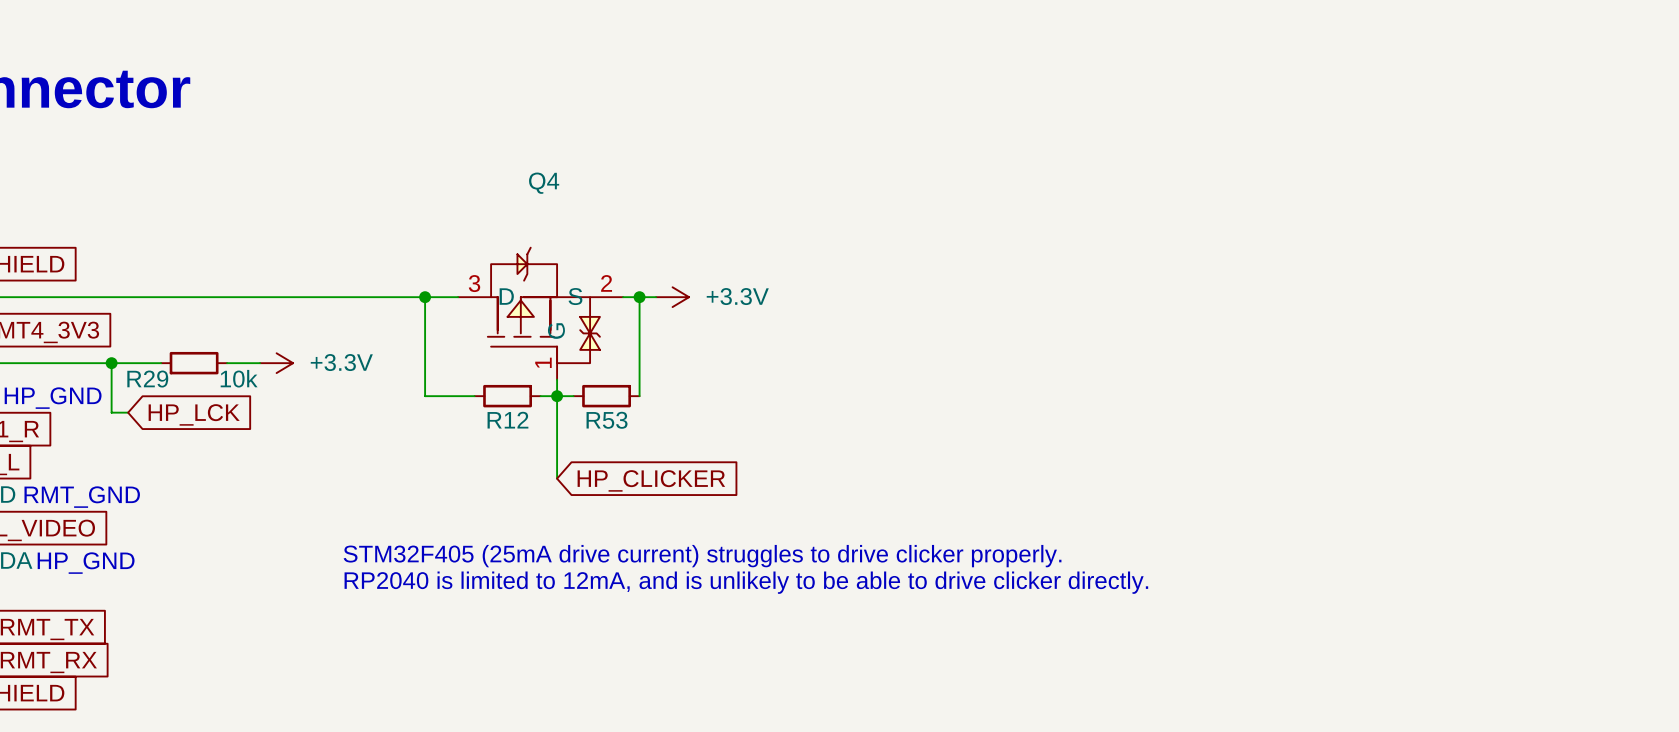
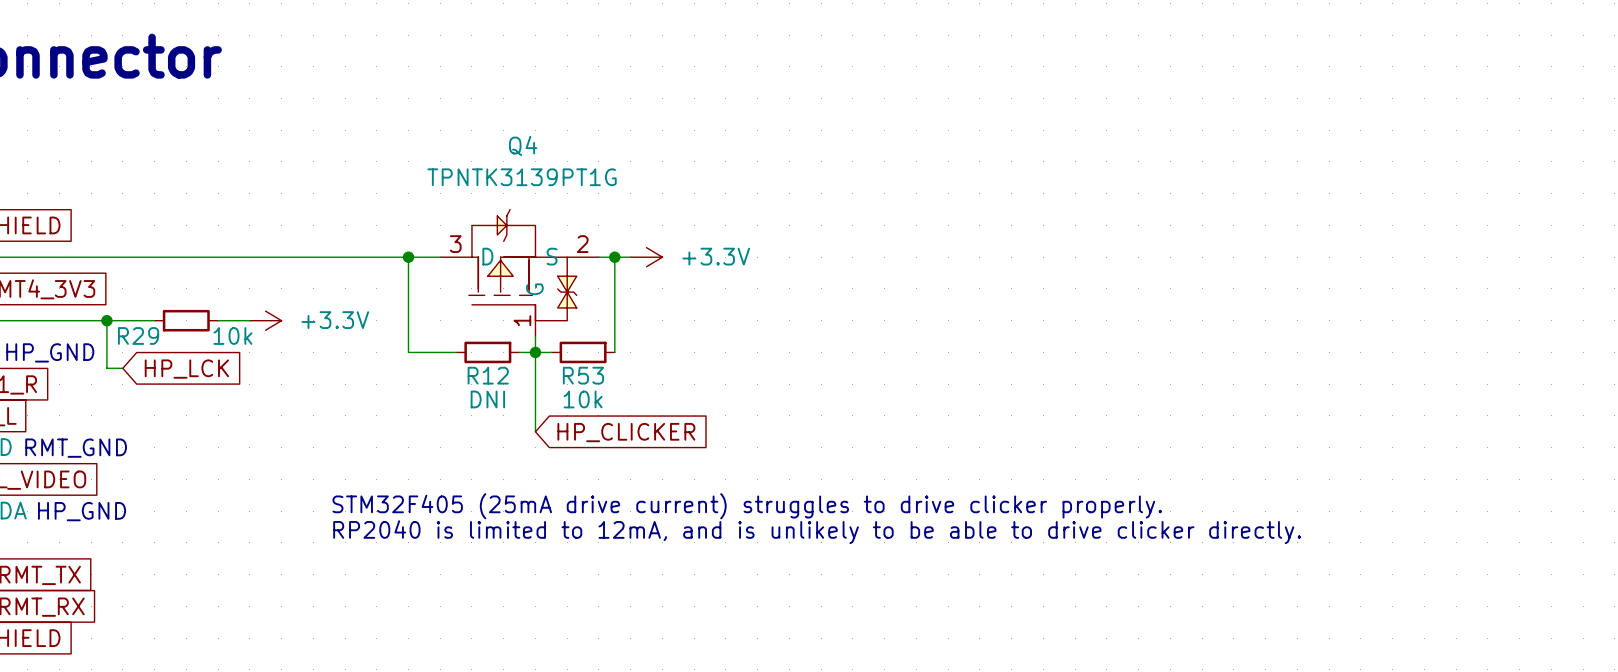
Q4 value: none -> TPNTK3139PT1G (522, 177)
R53 value: none -> 10k (583, 399)
R12 value: none -> DNI (487, 399)

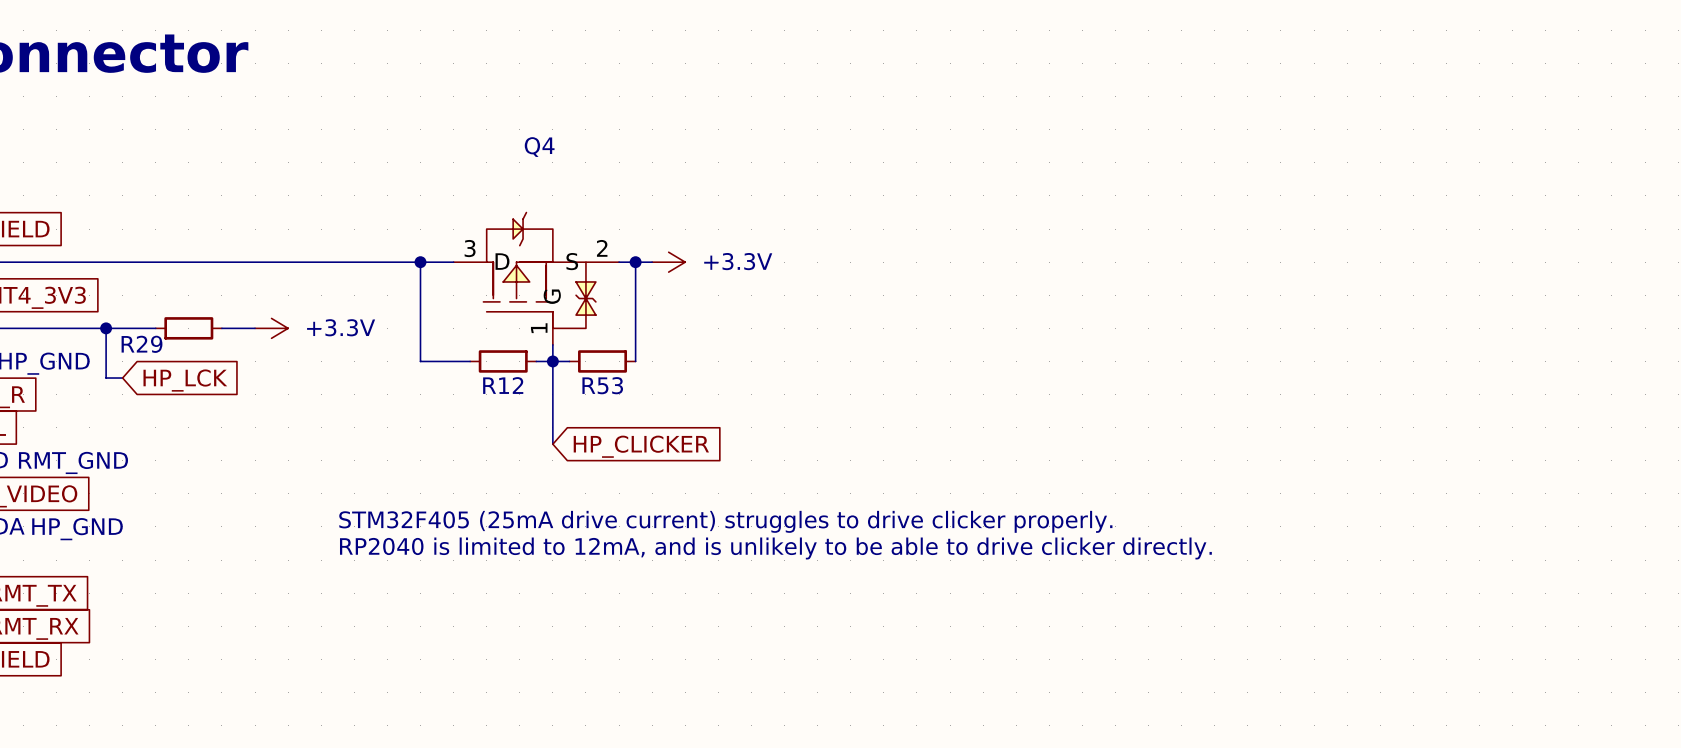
Q4 value: TPNTK3139PT1G (522, 177) -> none
R29 value: 10k (232, 335) -> none
R12 value: DNI (487, 399) -> none
R53 value: 10k (583, 399) -> none

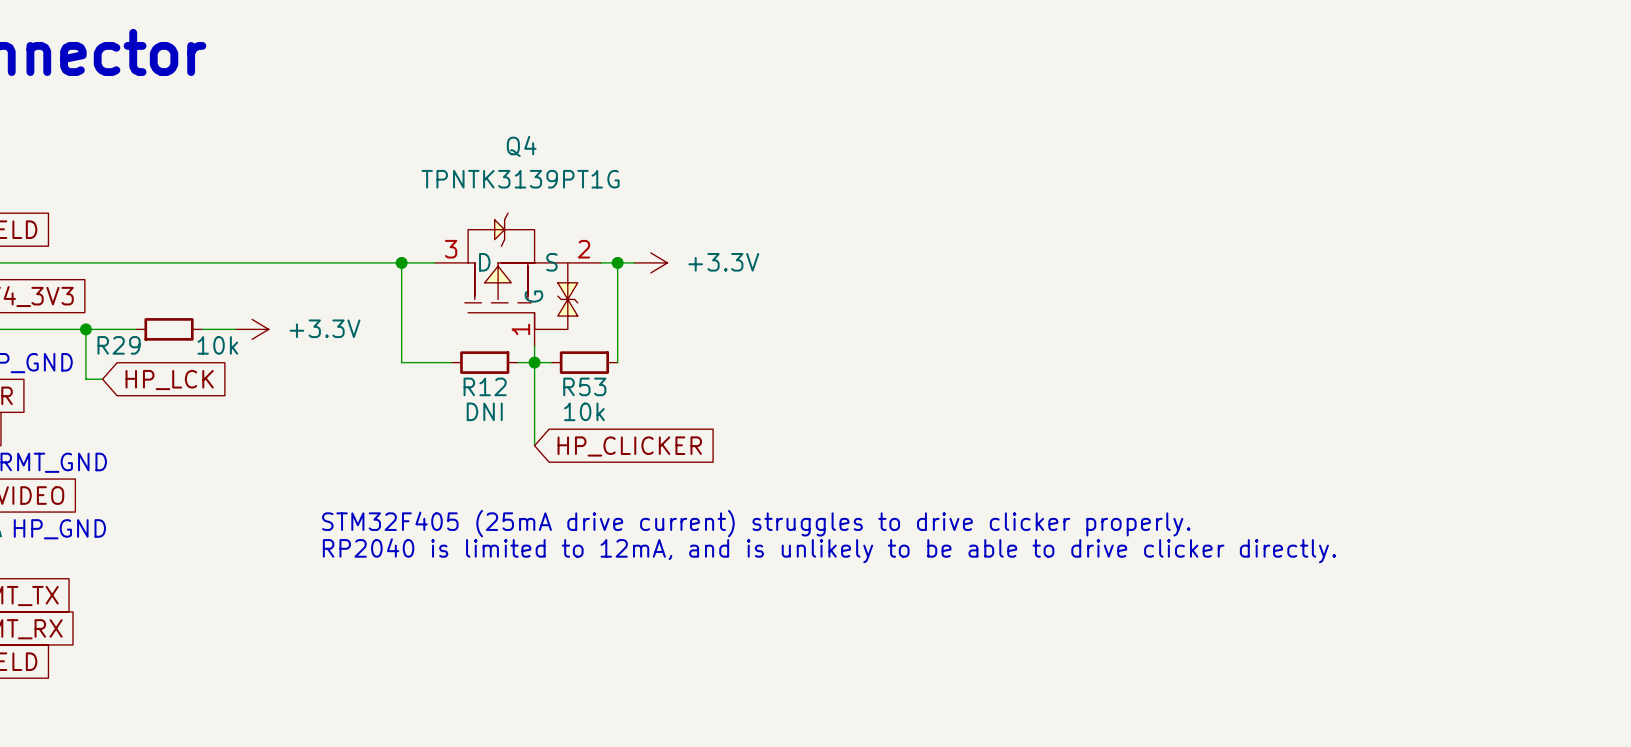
Q4 value: none -> TPNTK3139PT1G (520, 179)
R29 value: none -> 10k (217, 345)
R12 value: none -> DNI (484, 411)
R53 value: none -> 10k (584, 411)

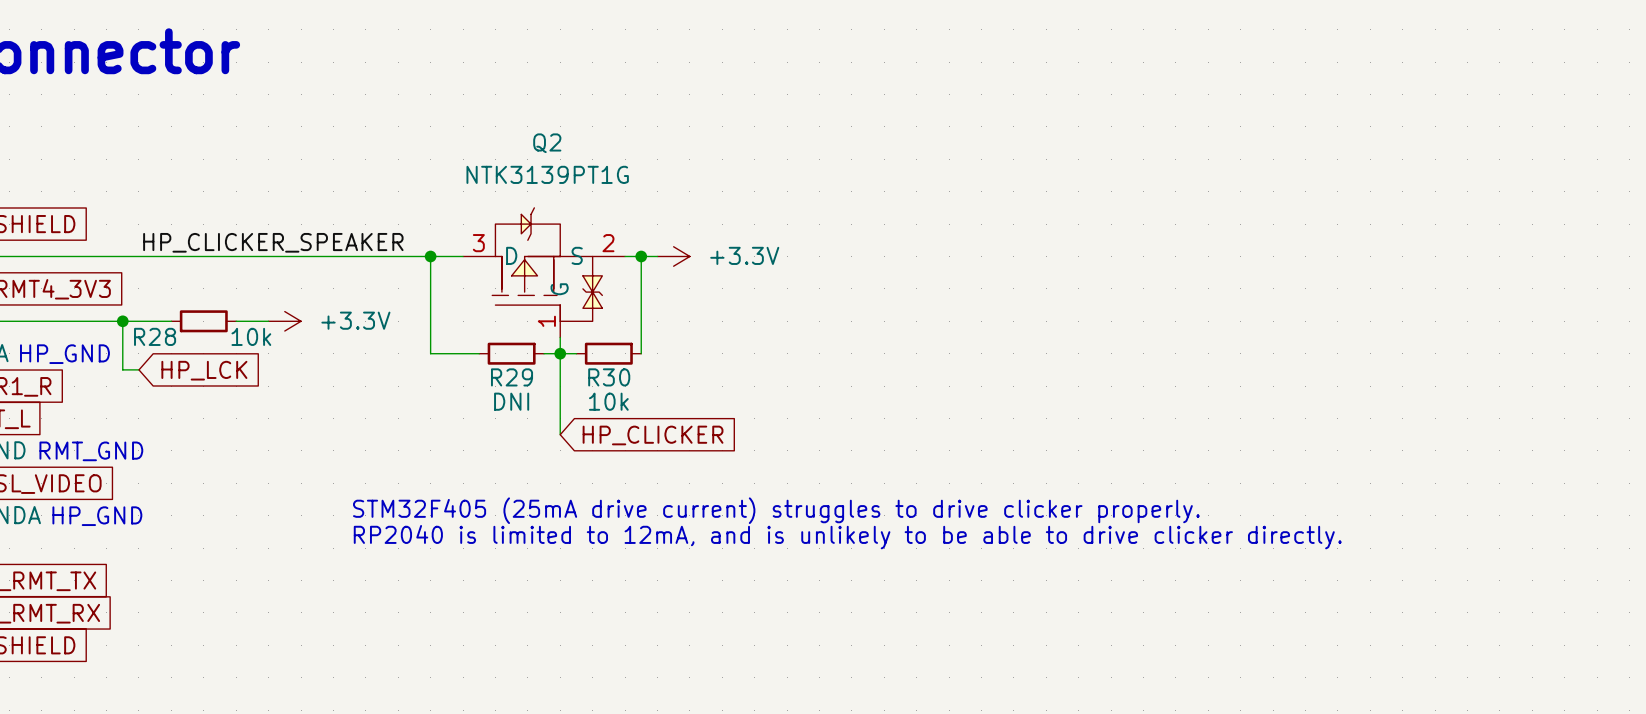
Q4 name: Q4 (521, 146) -> Q2 (547, 143)
Q4 value: TPNTK3139PT1G (520, 179) -> NTK3139PT1G (547, 174)
label: none -> HP_CLICKER_SPEAKER (273, 242)
R29 name: R29 (119, 345) -> R28 (155, 336)
R12 name: R12 (485, 386) -> R29 (512, 377)
R53 name: R53 (584, 386) -> R30 (609, 377)

